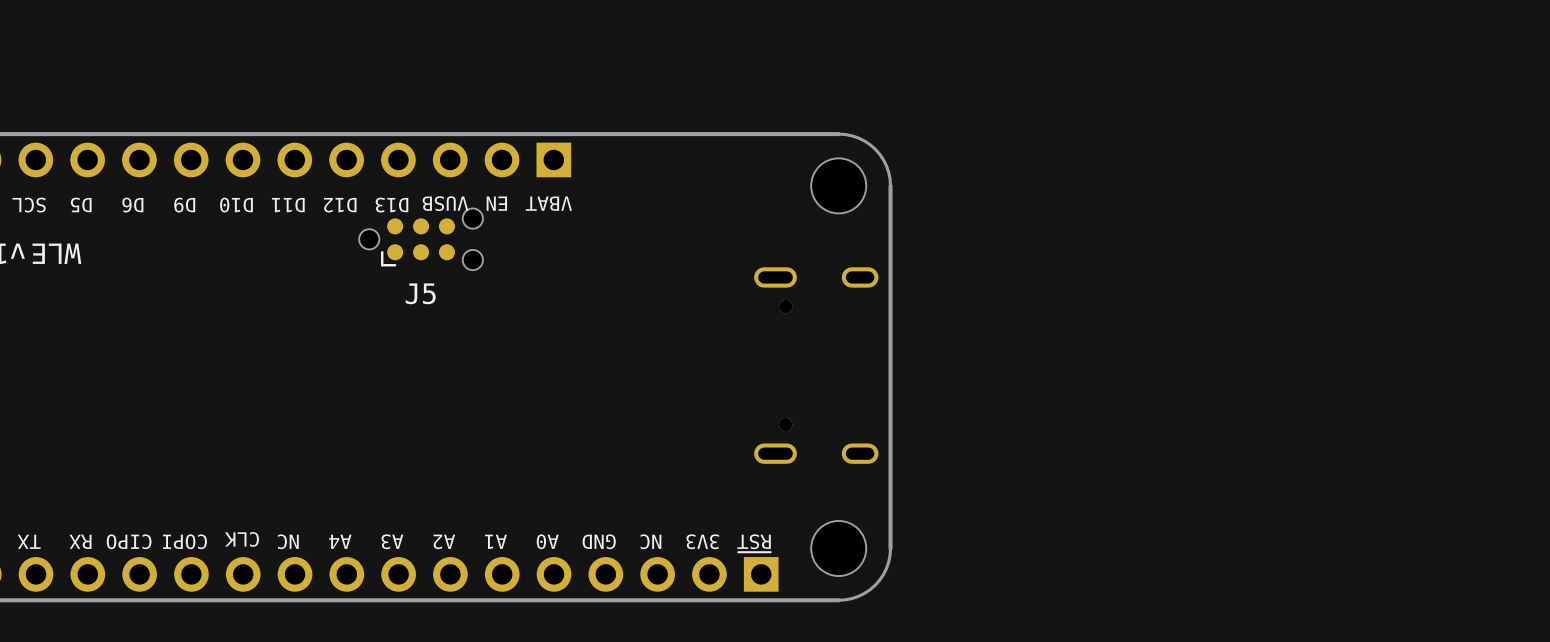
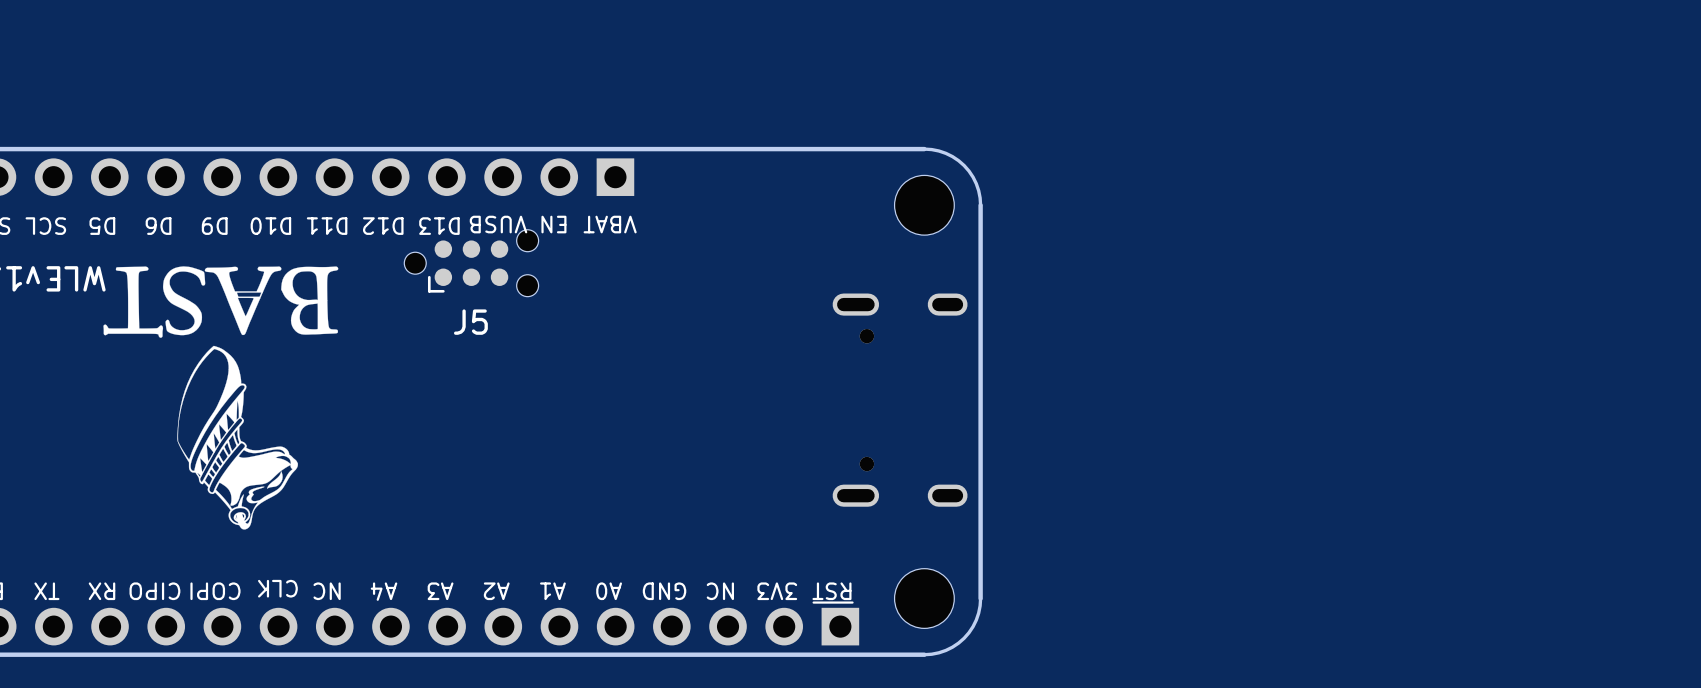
drawing: none -> [103, 266, 339, 530]

